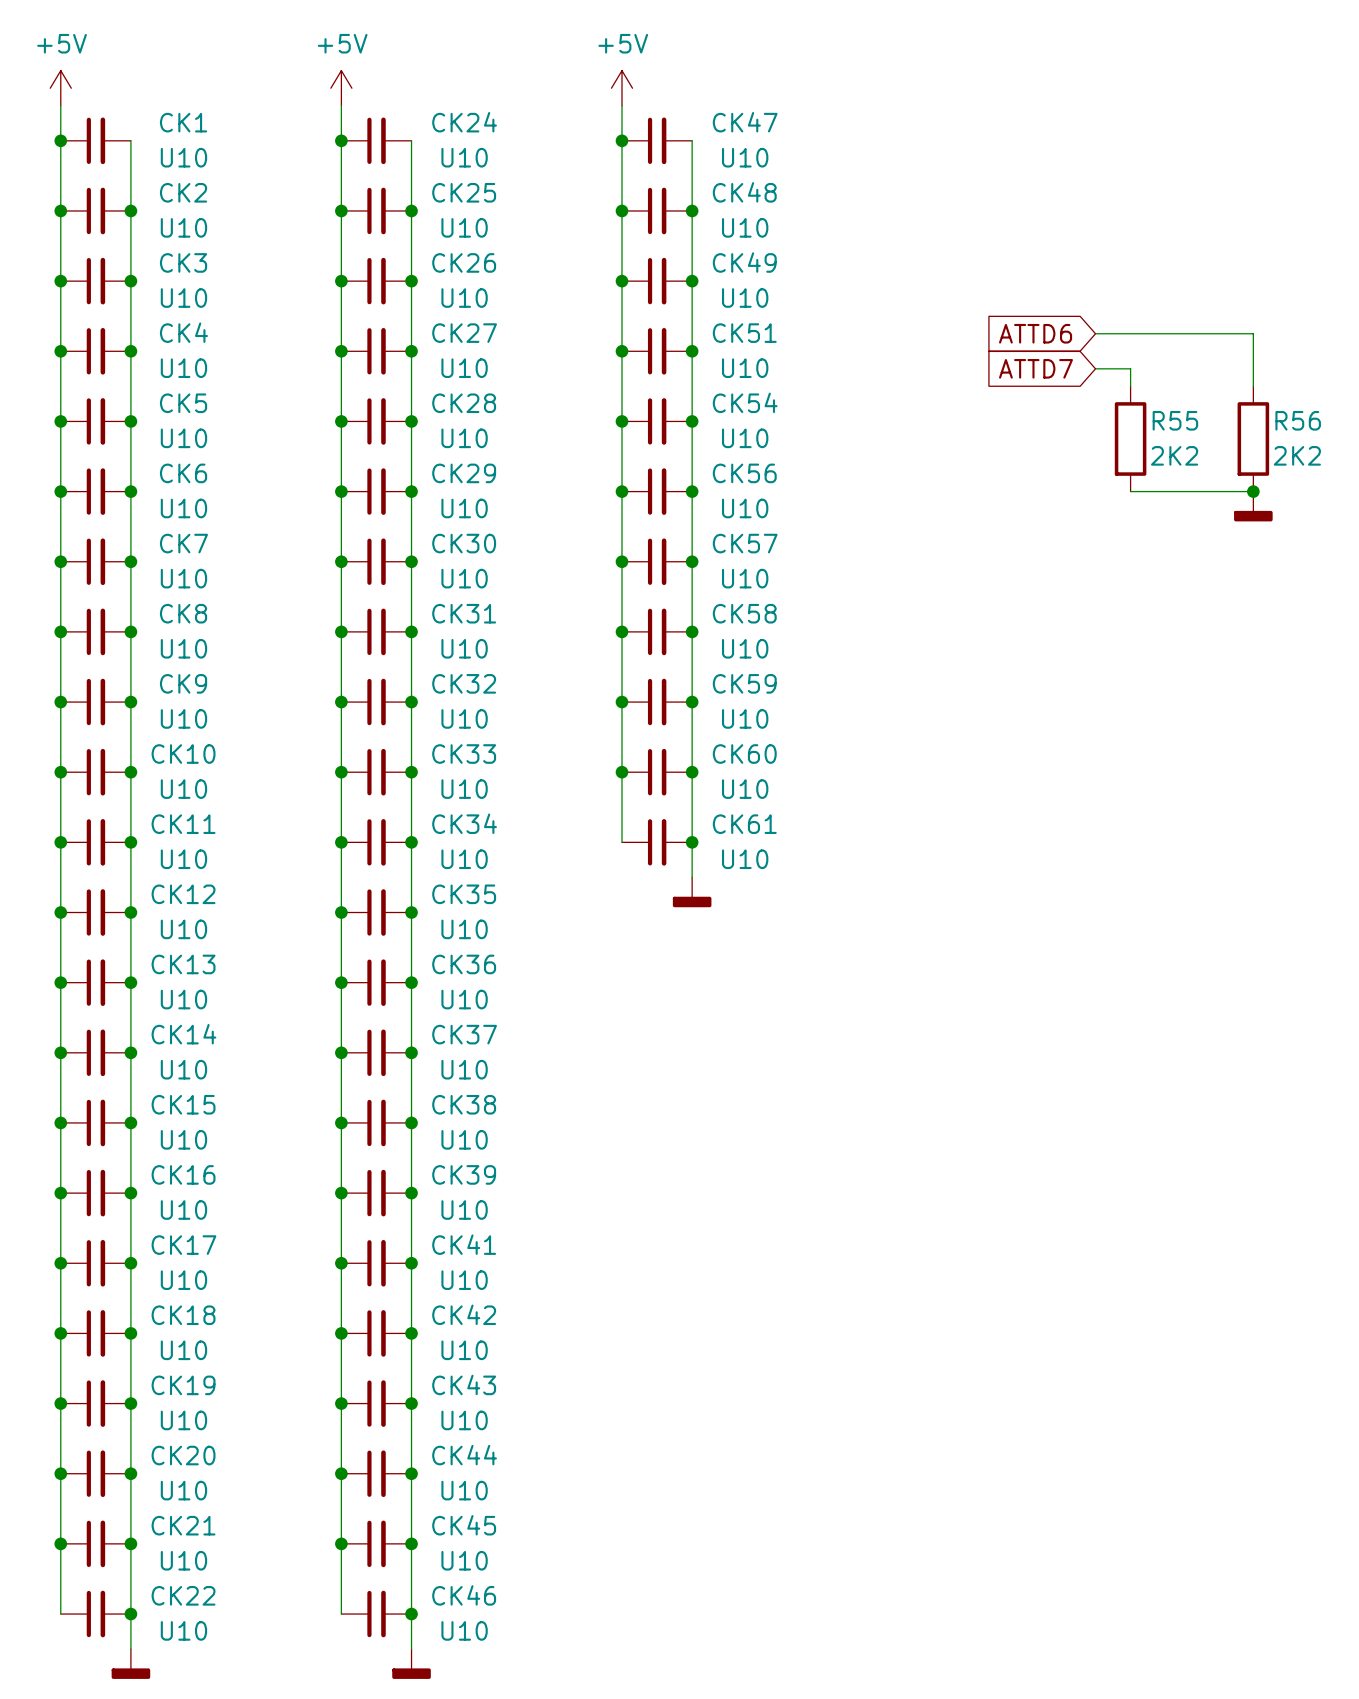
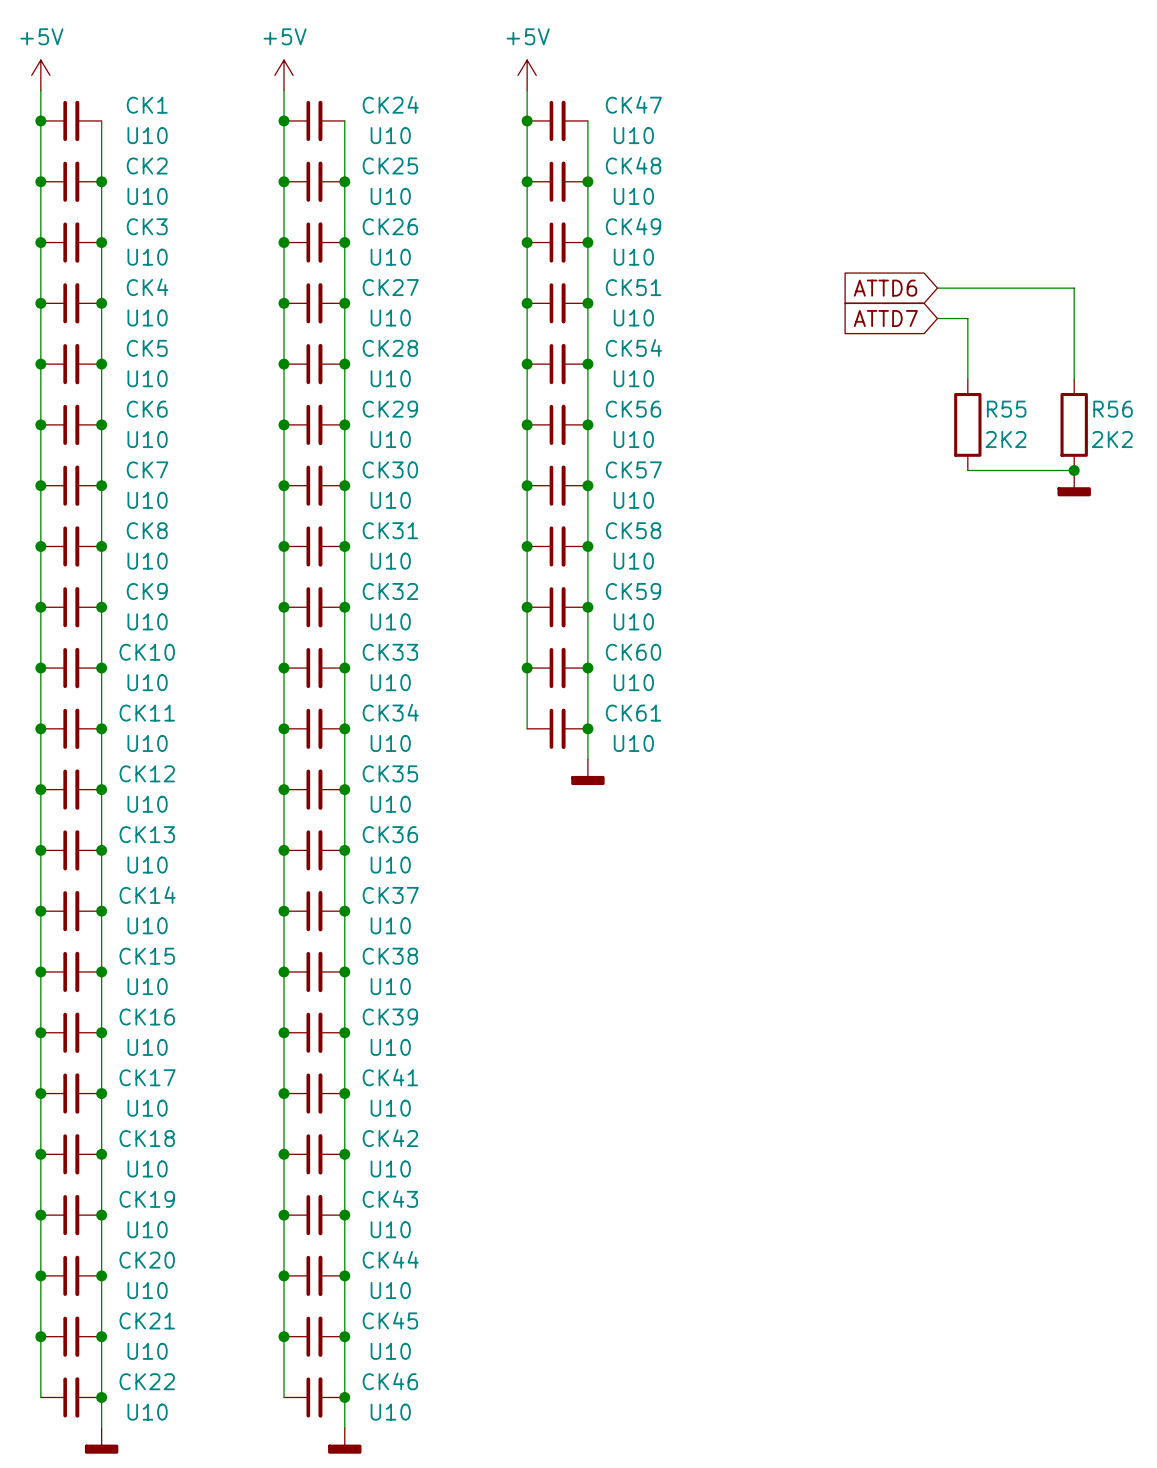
wire: none -> (967, 333) (967, 379)
wire: none -> (1074, 333) (1074, 379)
R55 position: (1130, 438) -> (967, 424)
R56 position: (1253, 438) -> (1074, 424)
wire: (1130, 491) (1253, 491) -> (967, 470) (1074, 470)
junction position: (1253, 491) -> (1074, 470)
power symbol position: (1253, 506) -> (1074, 483)

